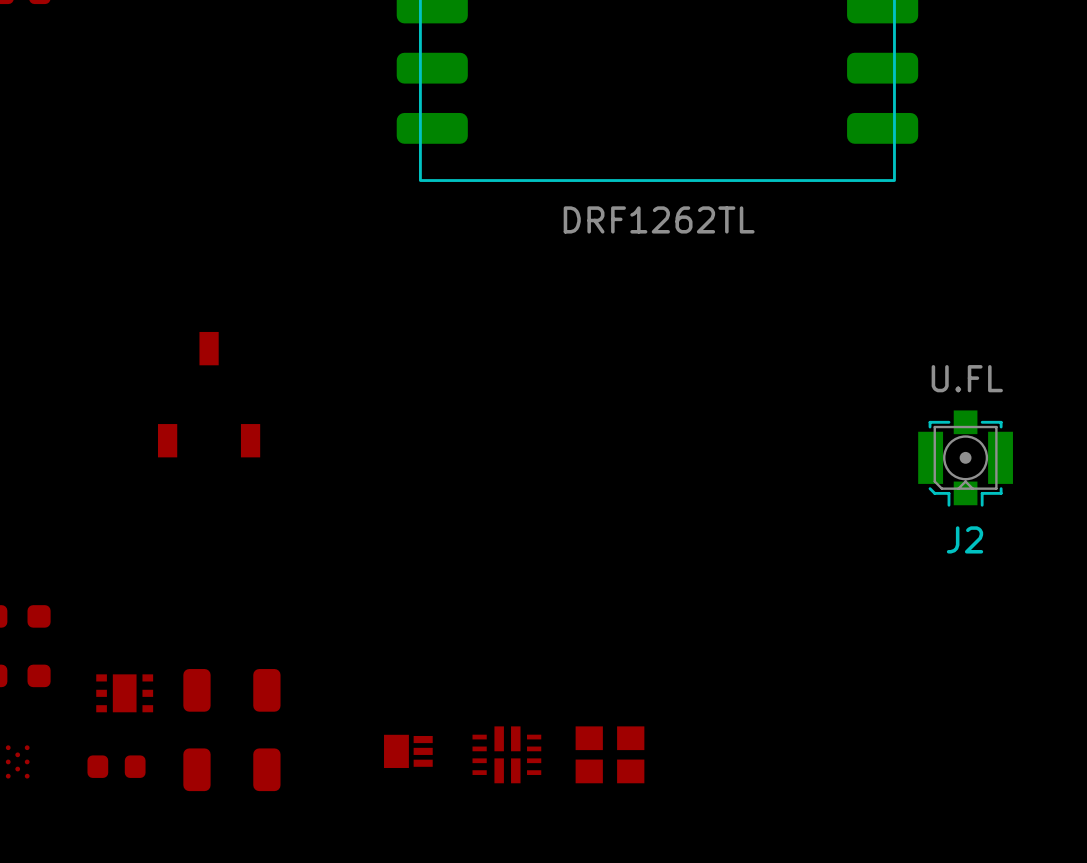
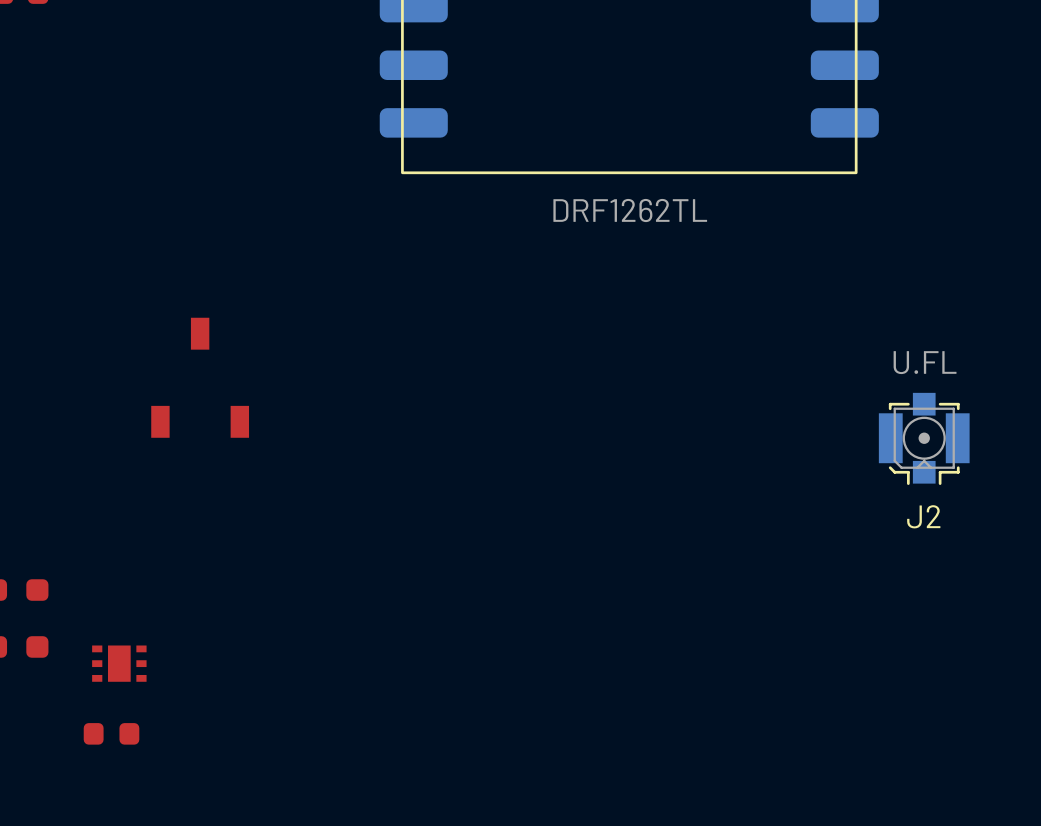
part: (231, 690) -> none
part: (408, 751) -> none
part: (506, 754) -> none
part: (609, 754) -> none
part: (17, 761) -> none
part: (231, 769) -> none

